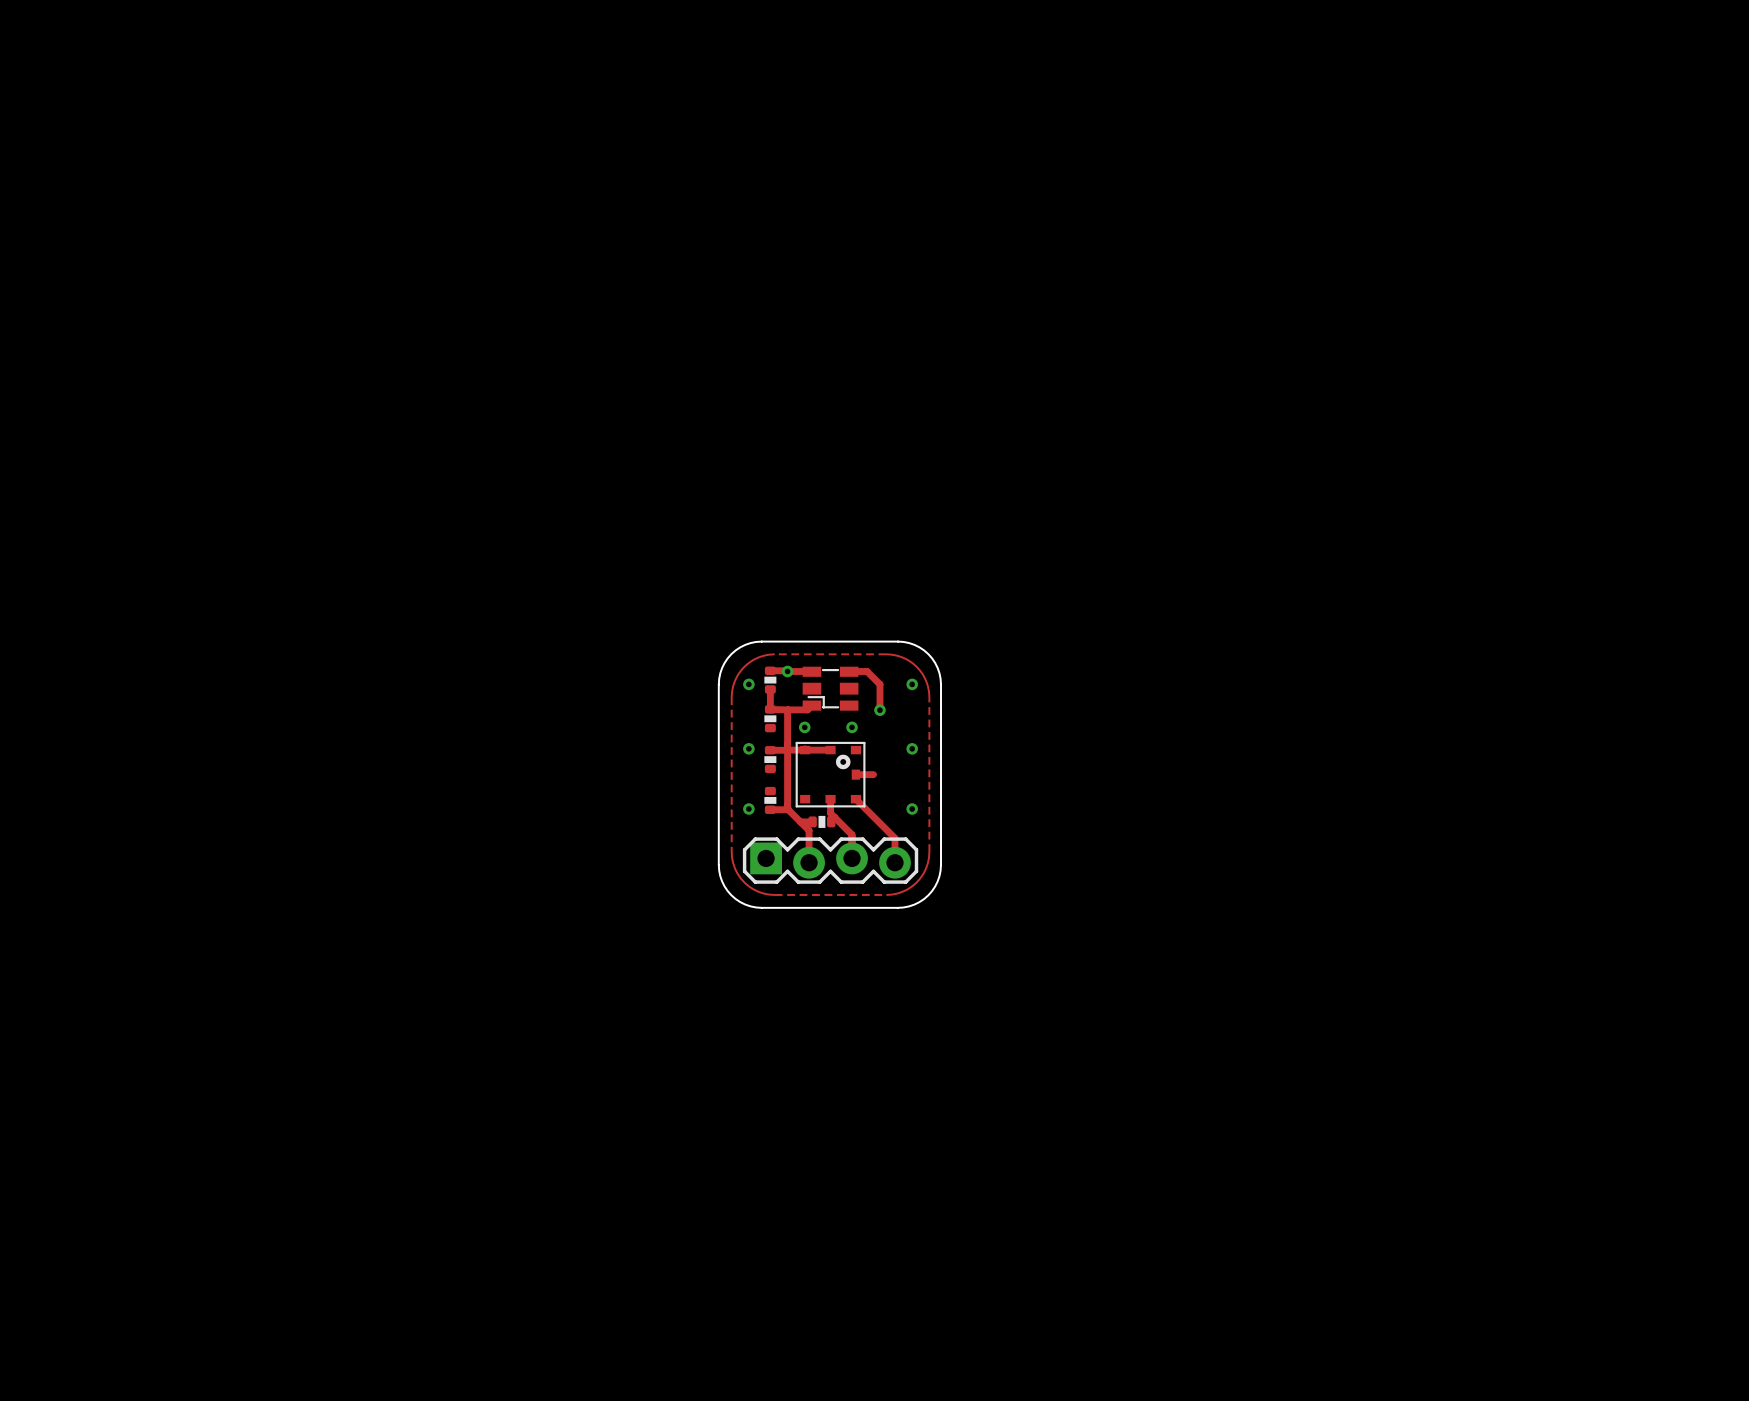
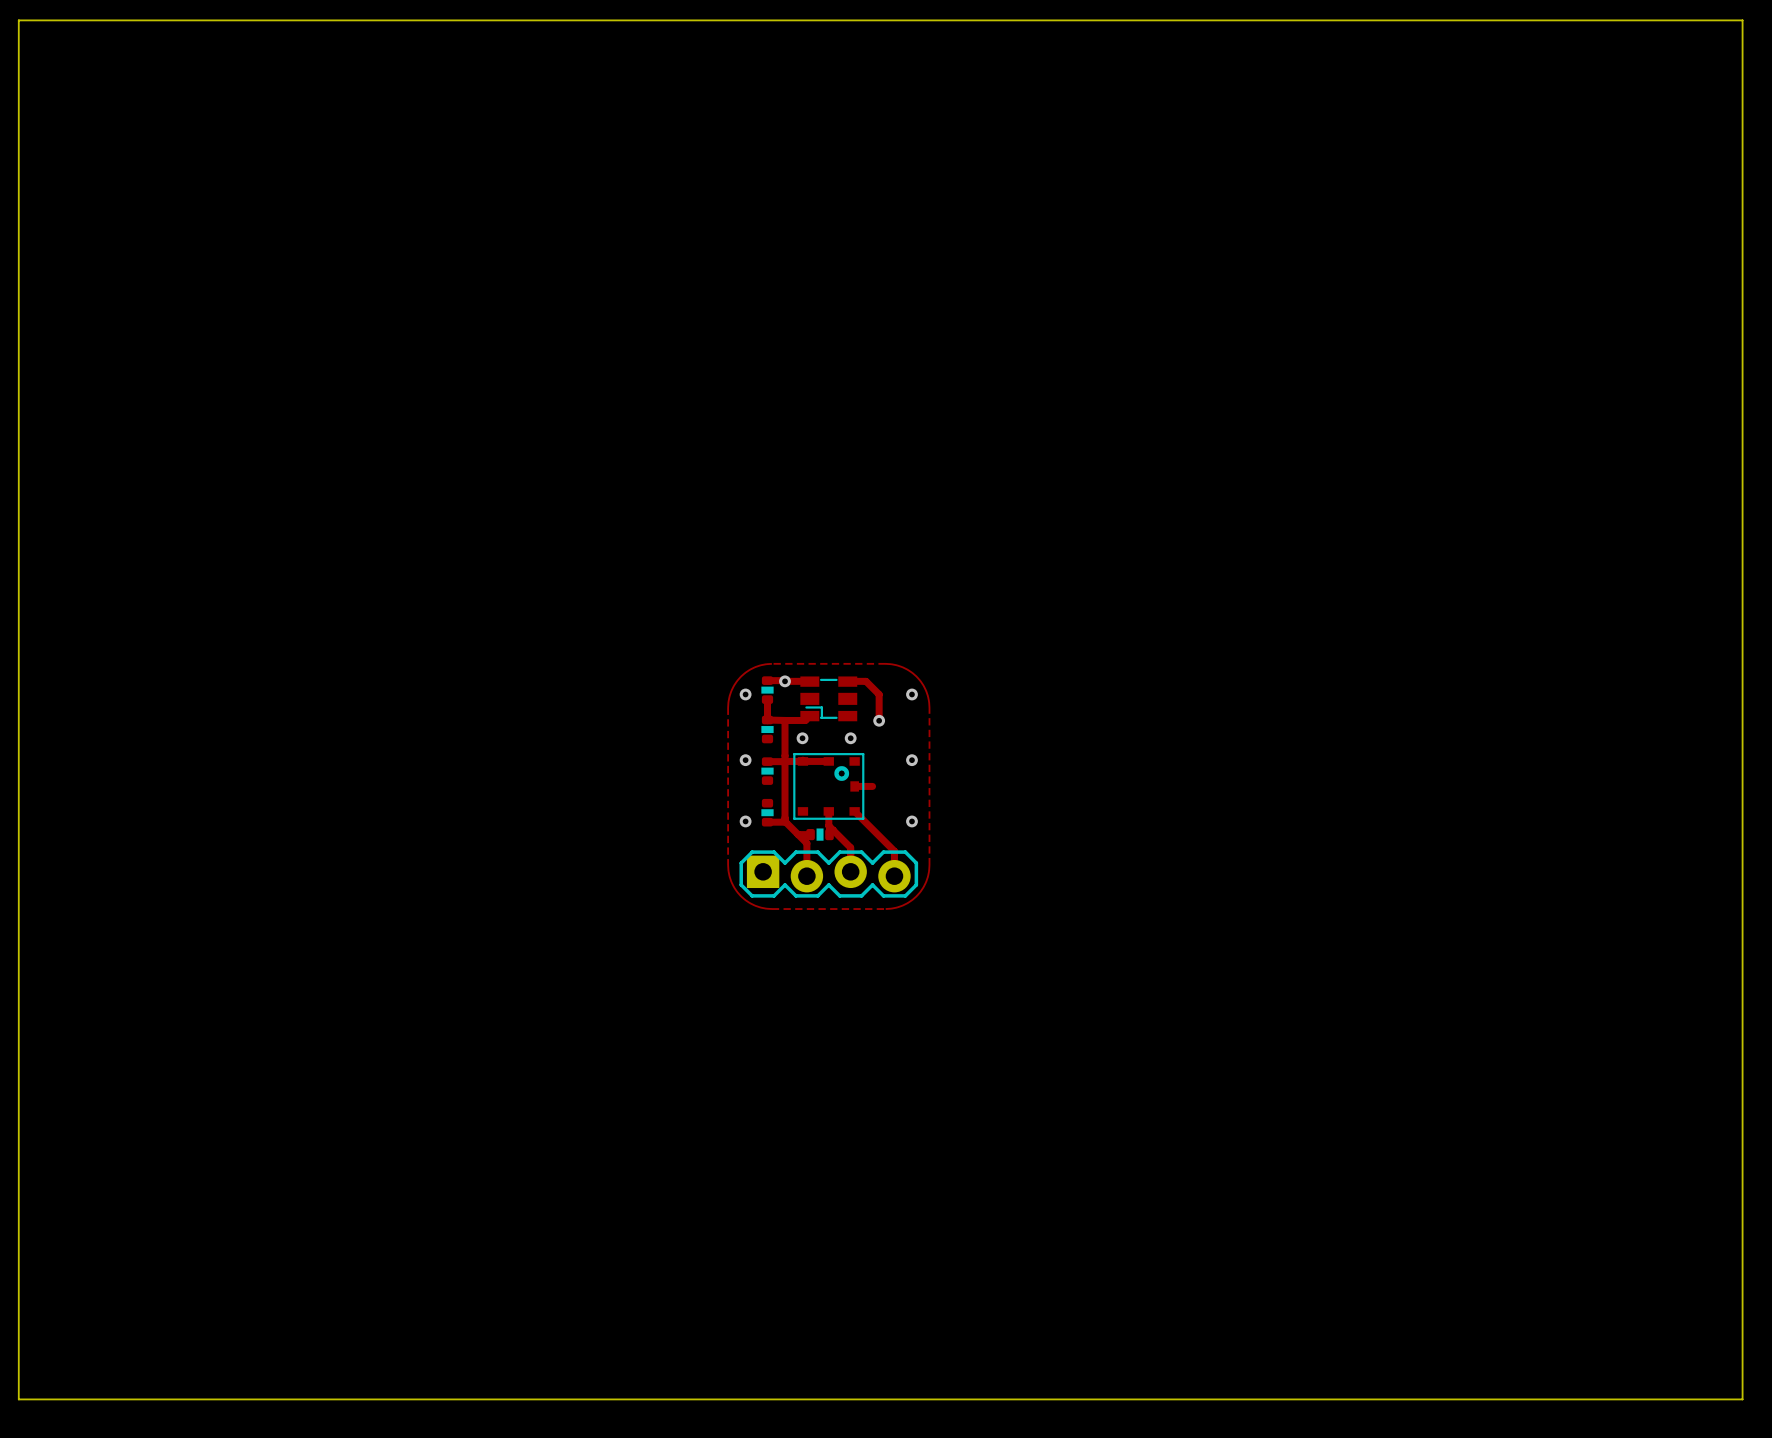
board edge: none -> (18, 20) (1742, 20) (1742, 1399) (18, 1399) (18, 20)
board edge: (761, 641) (903, 641) (924, 650) (935, 663) (940, 684) (940, 870) (932, 891) (919, 902) (898, 907) (756, 907) (735, 898) (724, 886) (718, 864) (719, 678) (722, 668) (731, 654) (745, 644) (761, 641) -> none

